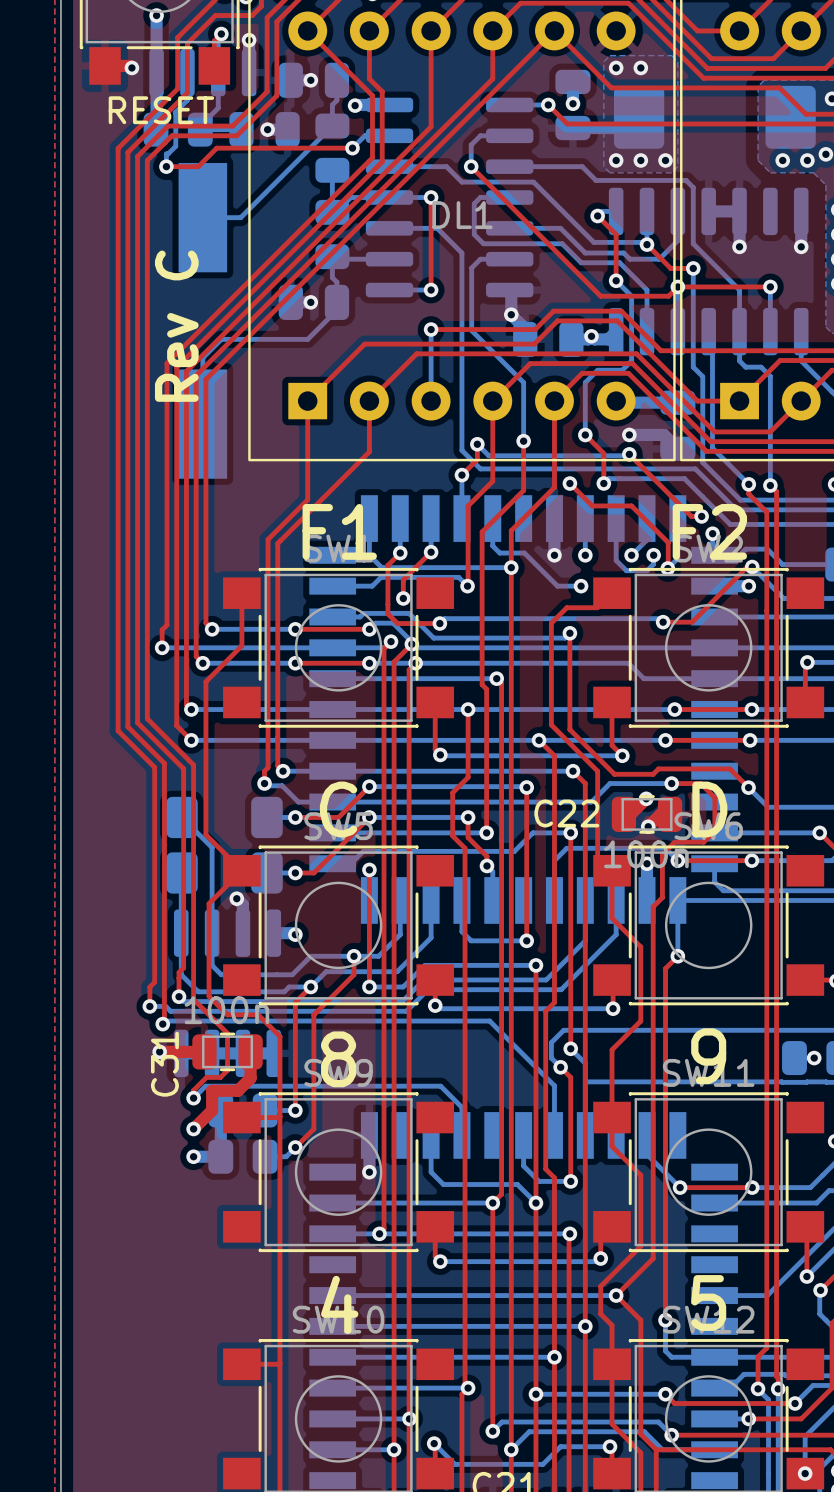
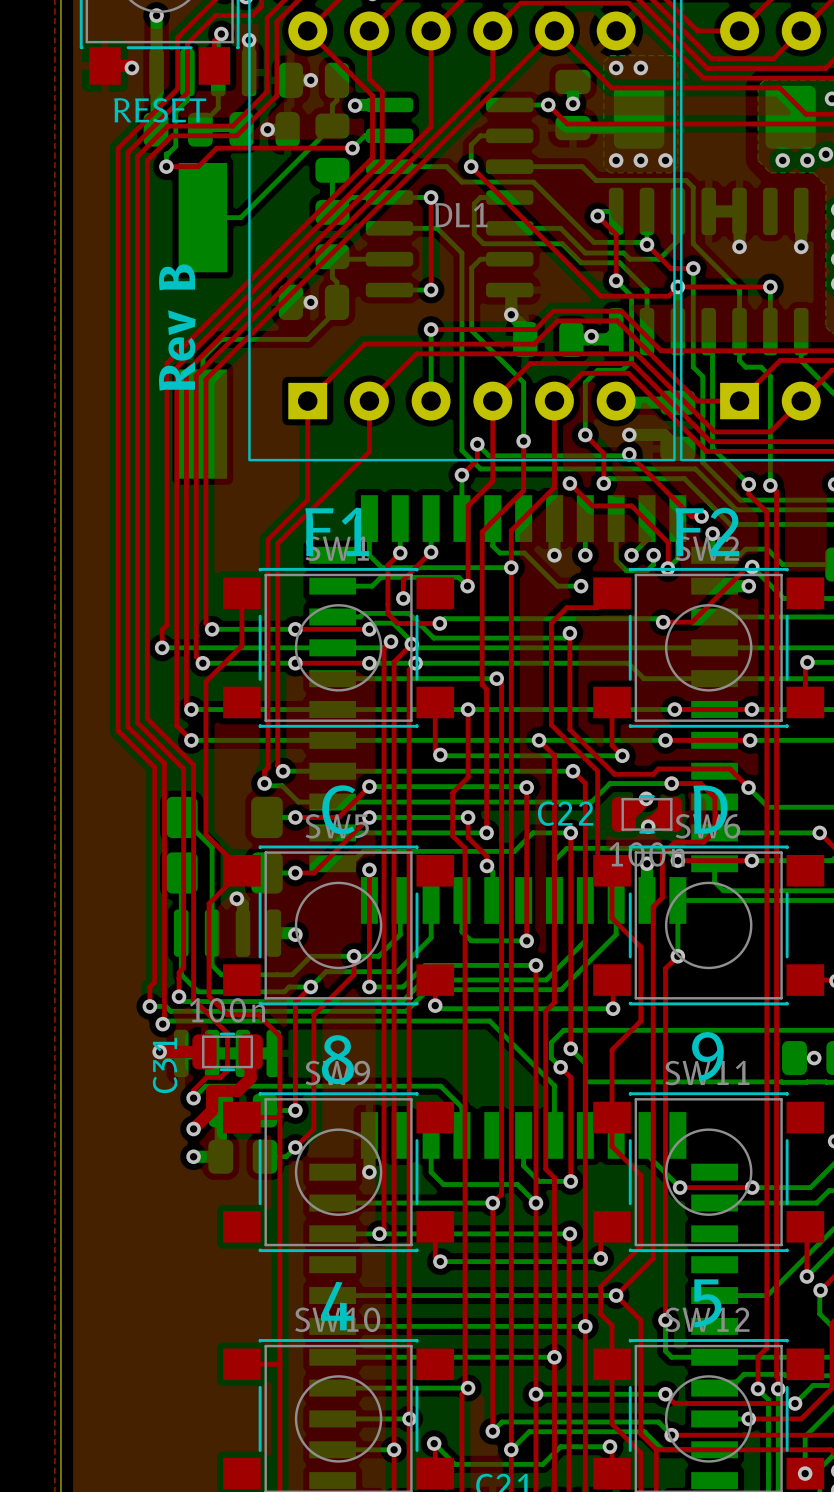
text: Rev C (176, 326) -> Rev B (177, 327)

